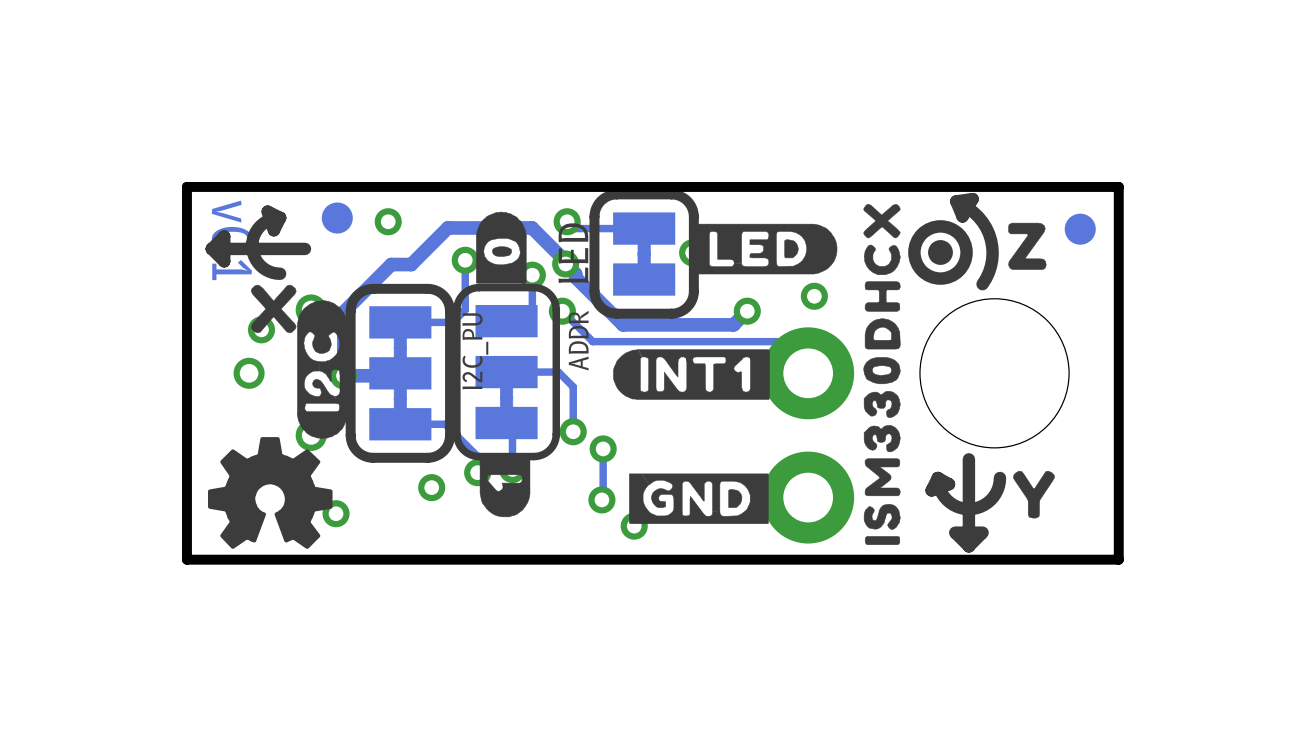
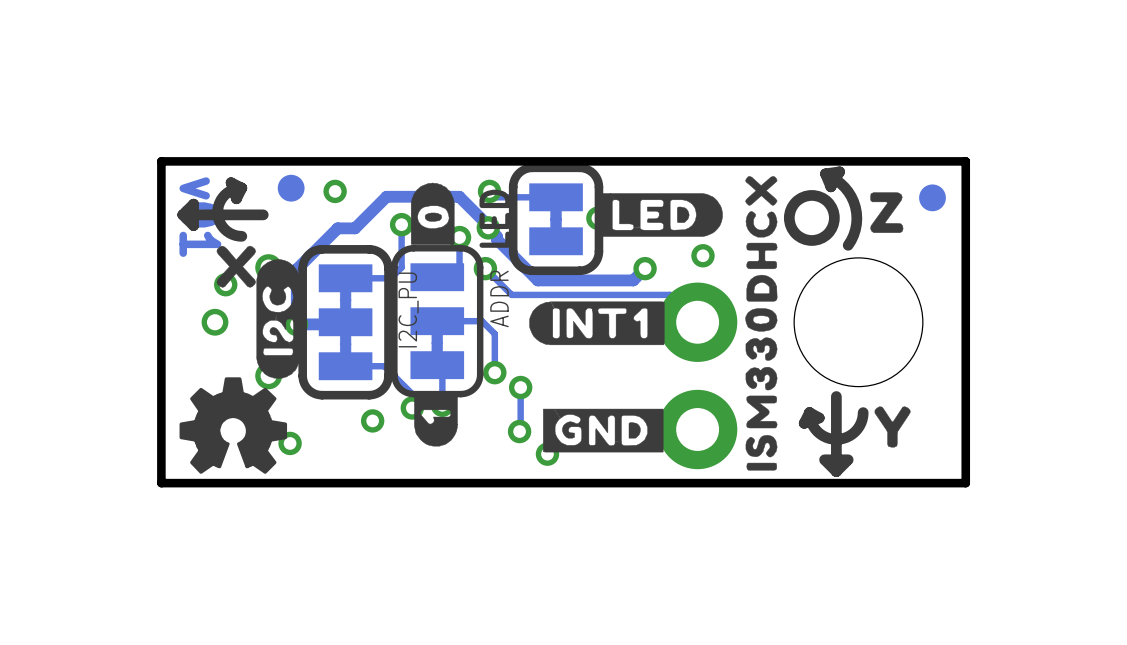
drawing: [928, 240, 953, 265] -> none

